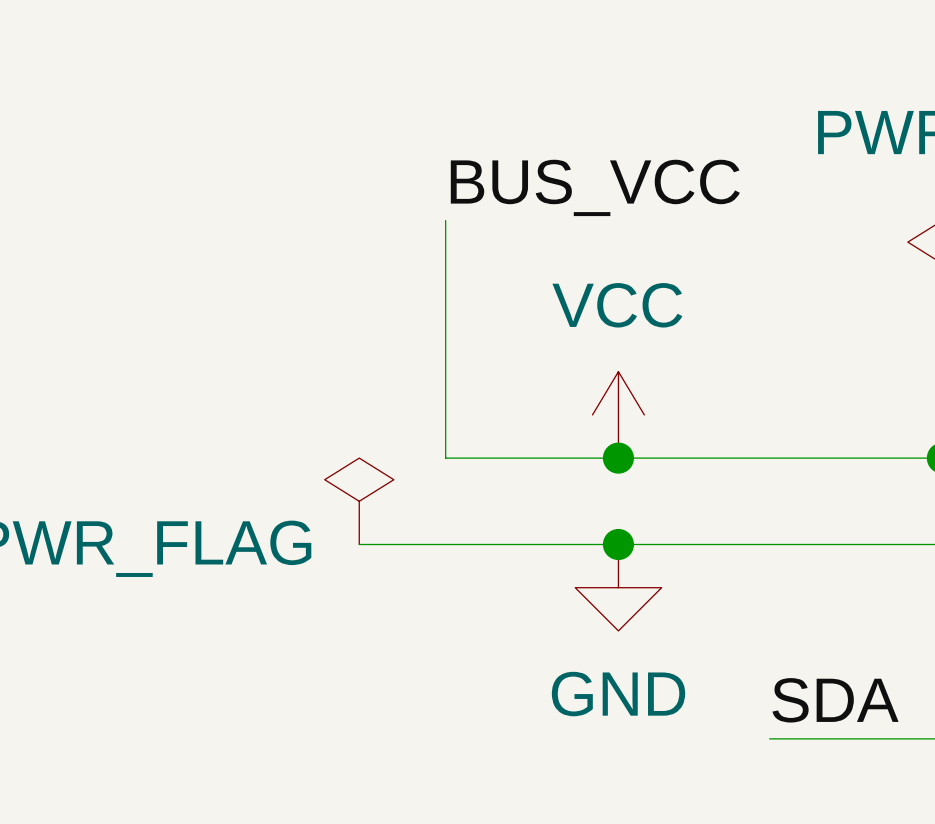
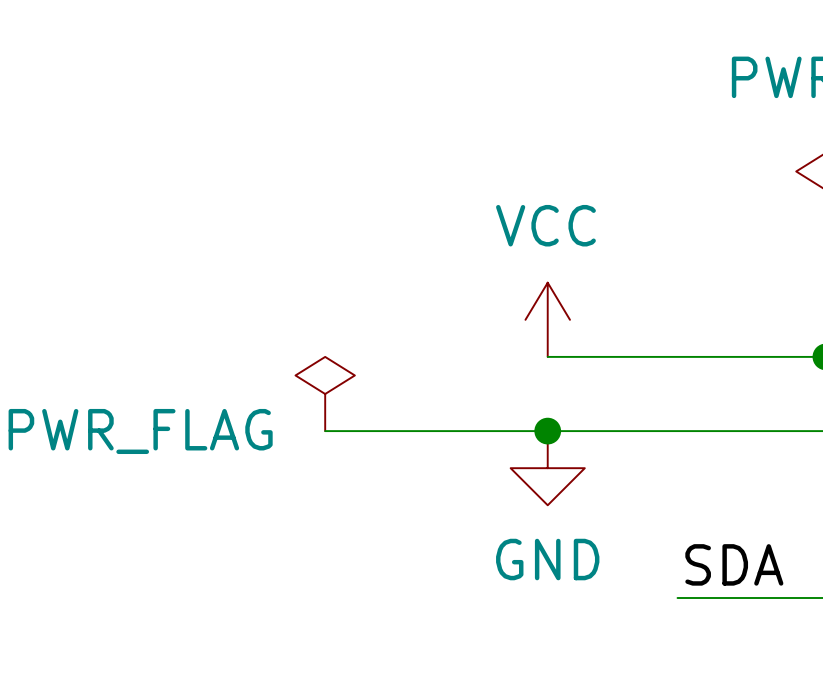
label: BUS_VCC (595, 187) -> none
wire: (445, 220) (445, 458) (618, 458) -> none
junction: (618, 458) -> none

